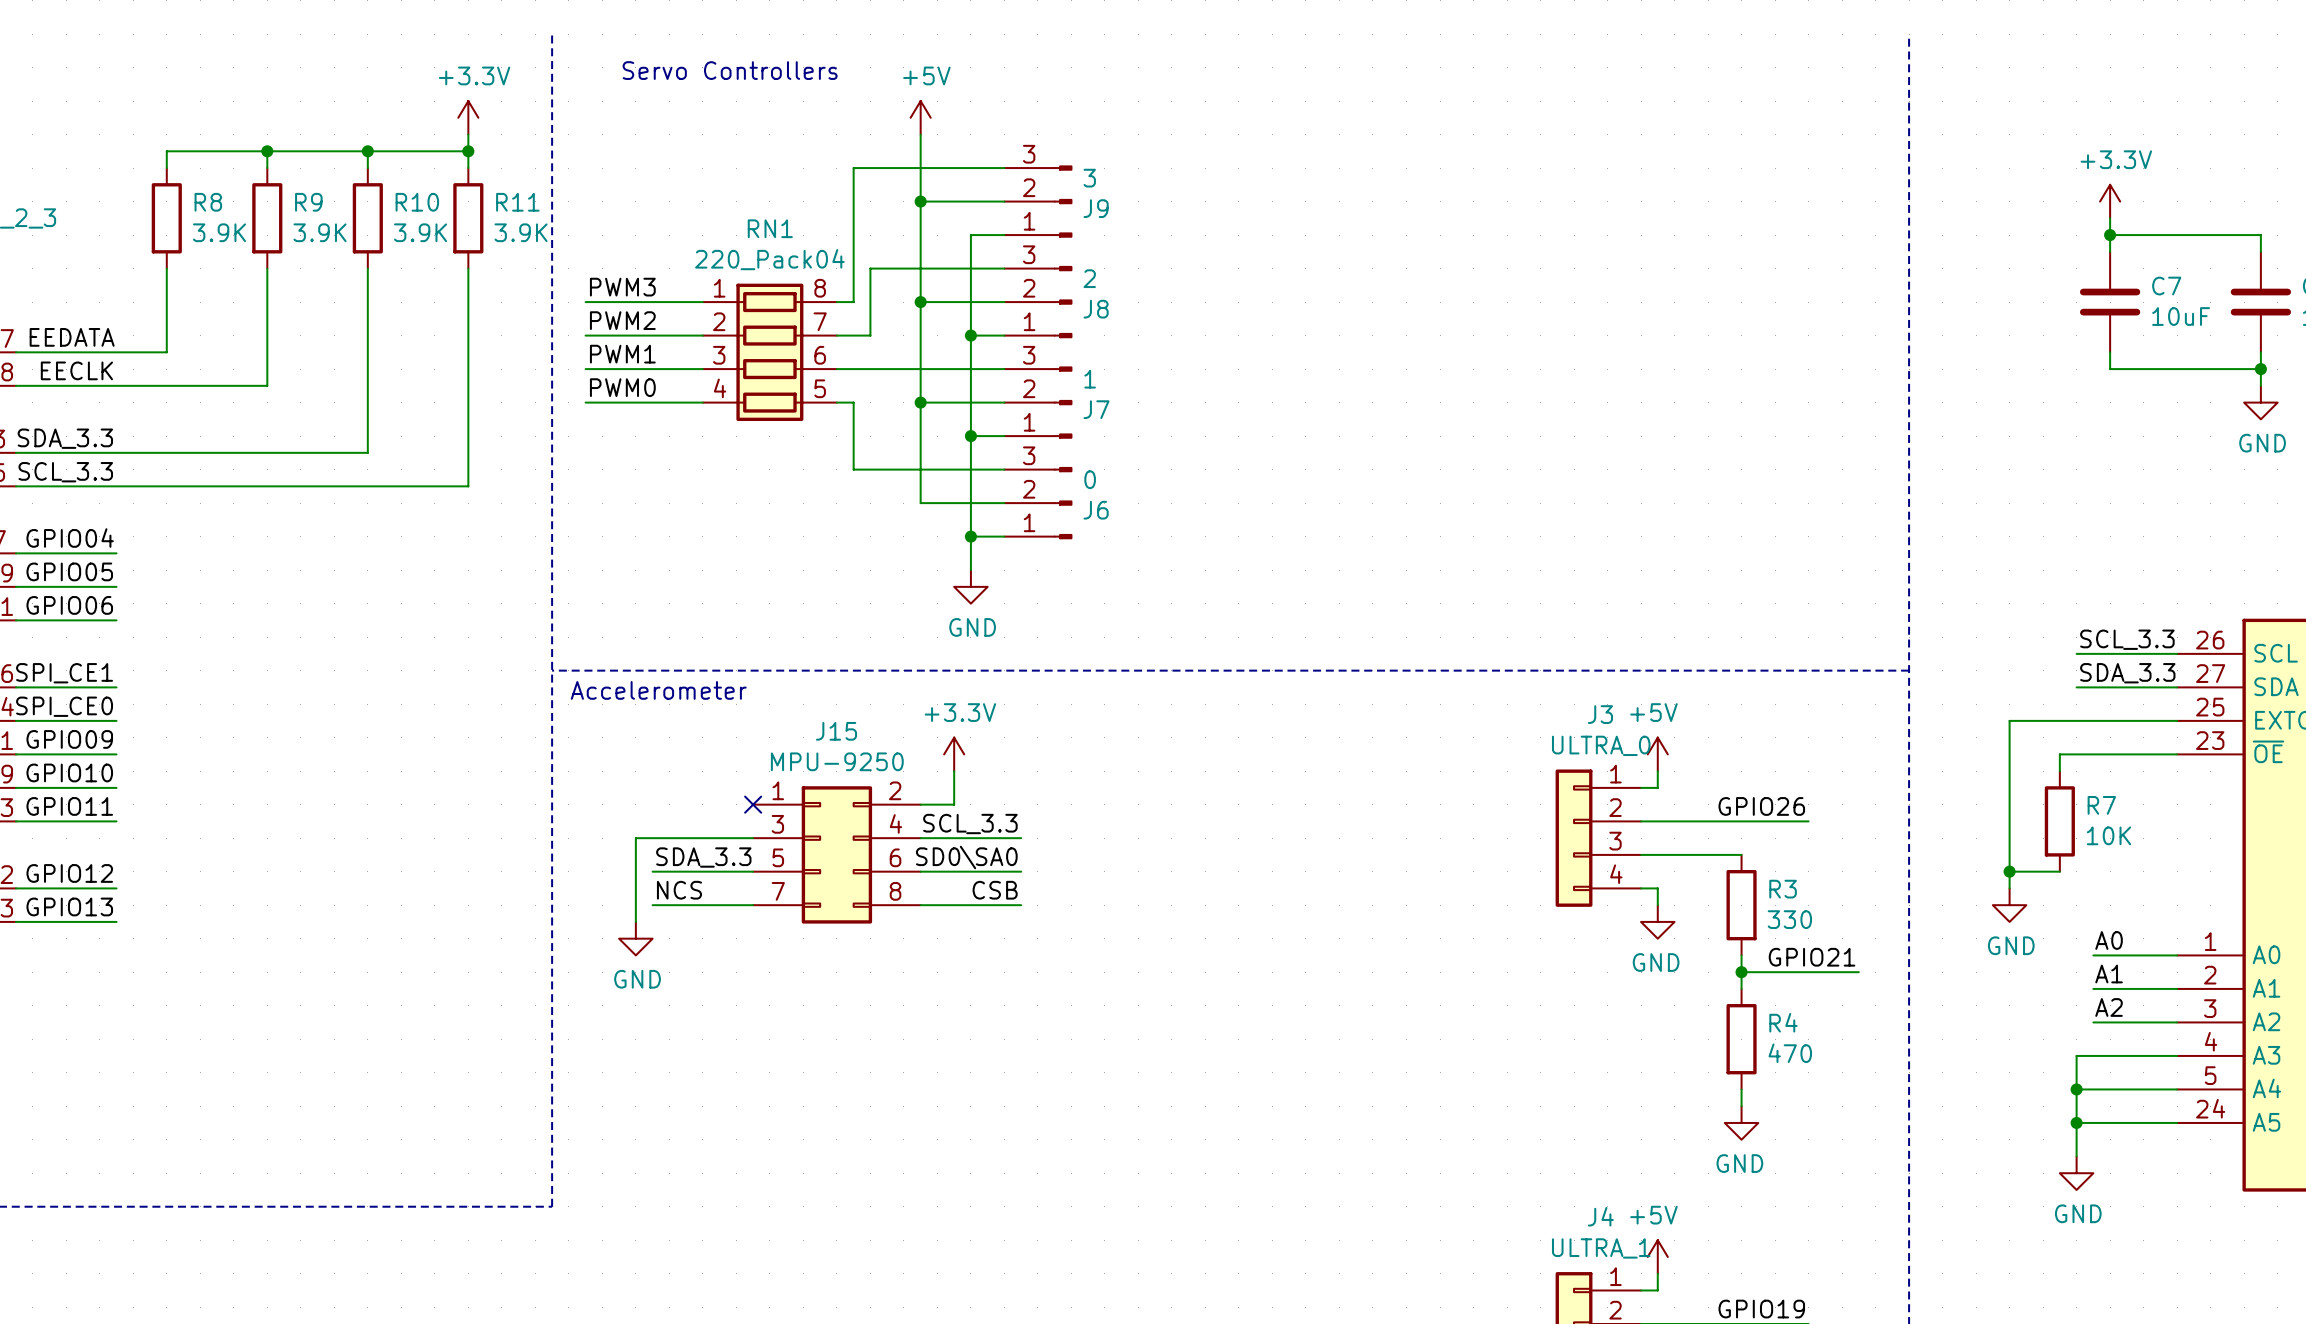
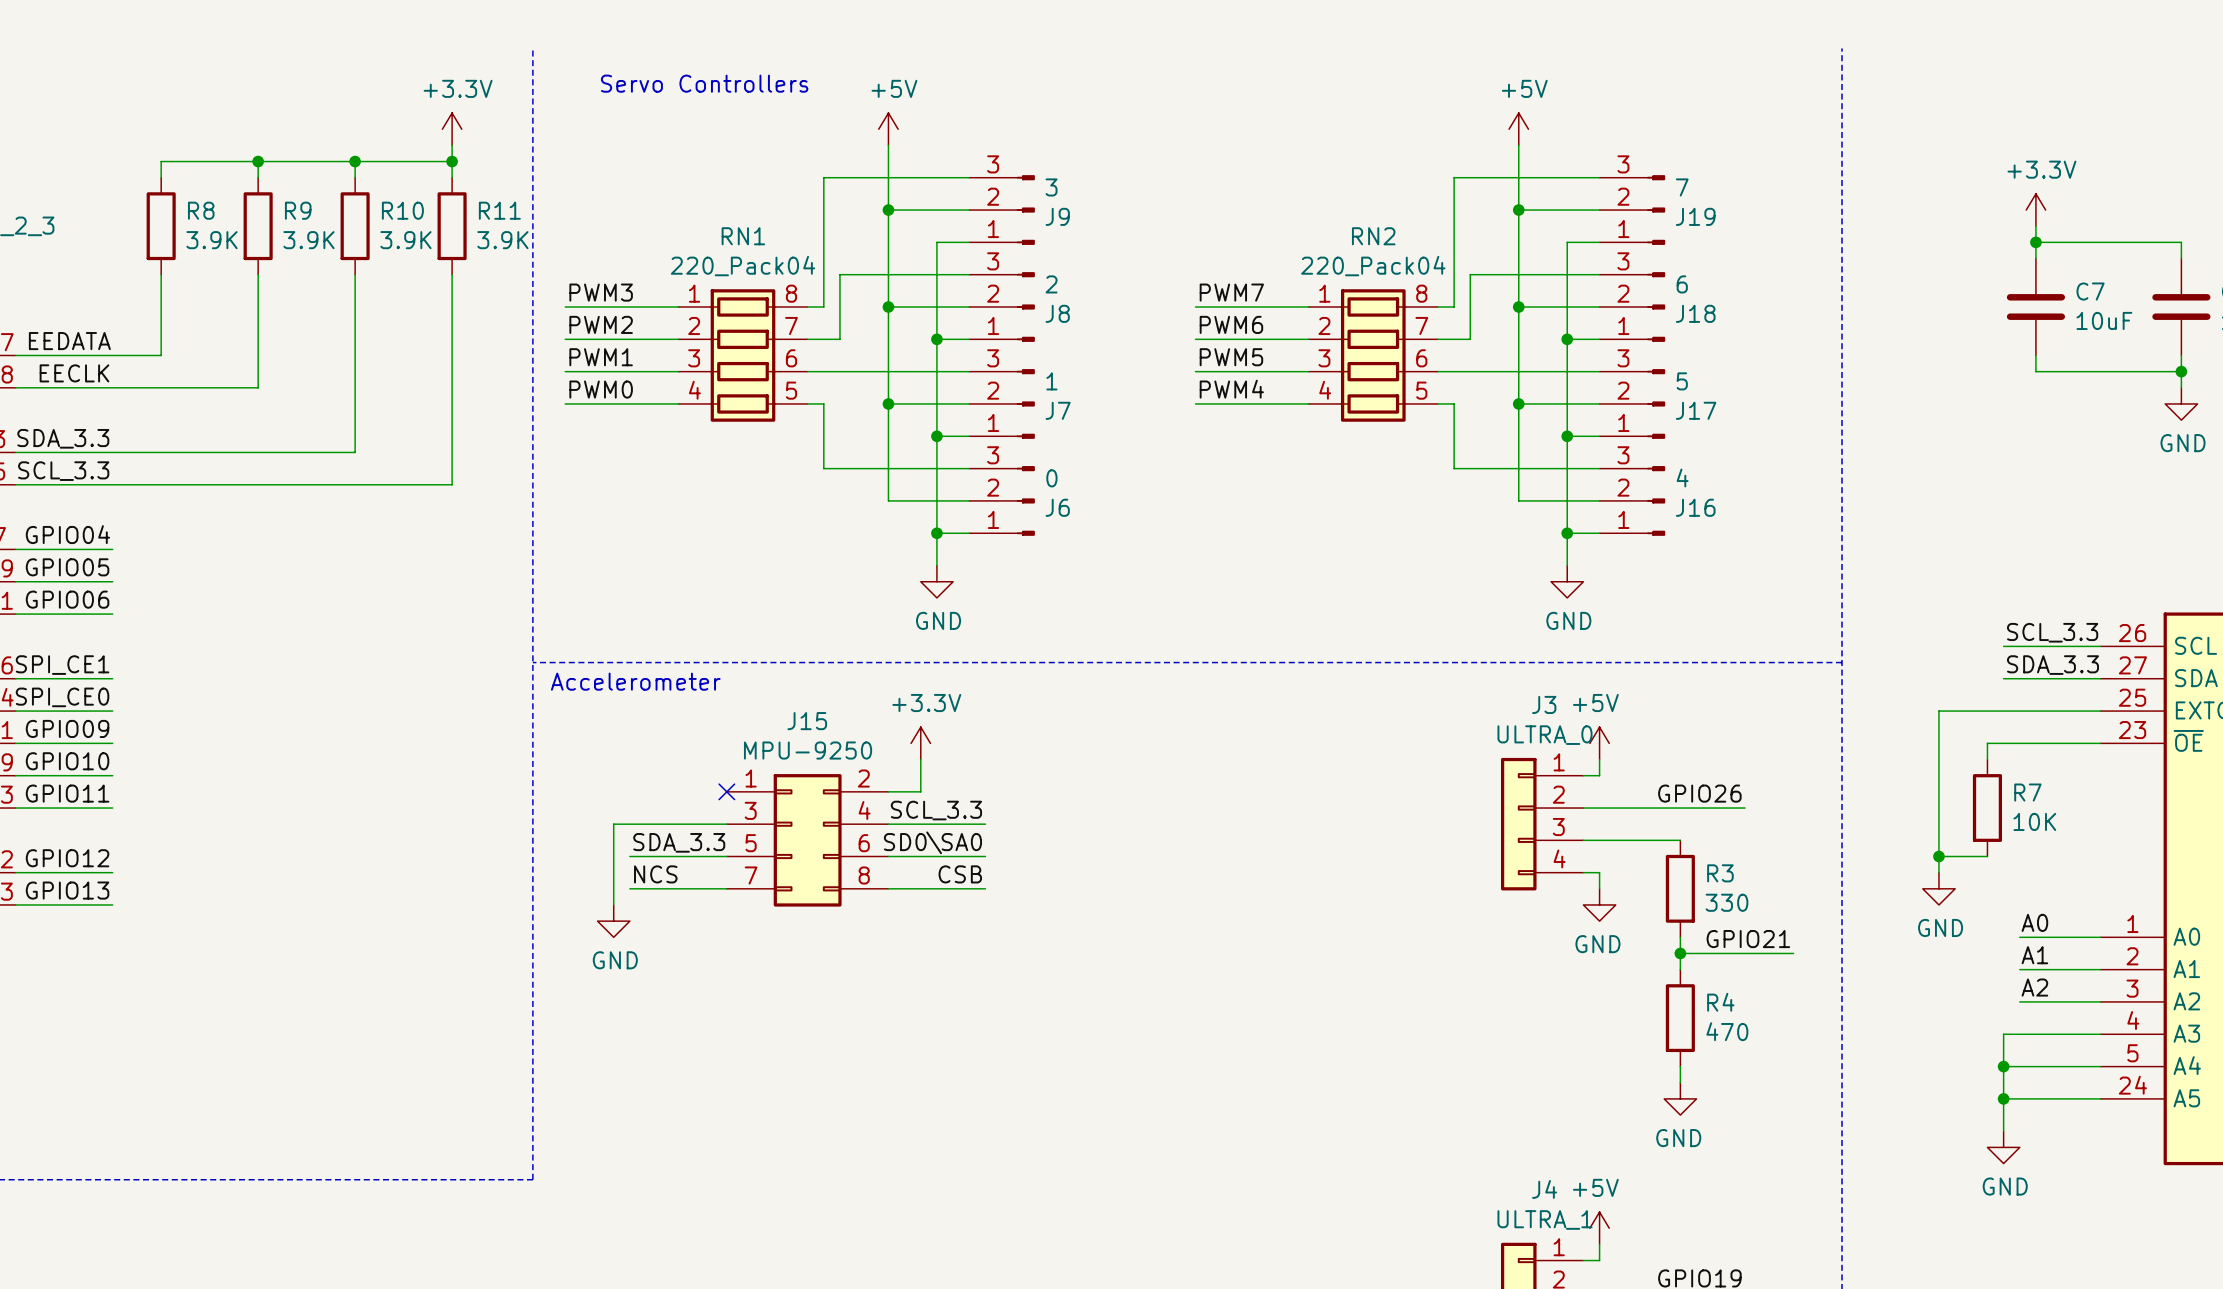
power symbol: none -> +5V (1518, 129)
wire: none -> (1518, 145) (1518, 500) (1599, 500)
wire: none -> (1599, 177) (1454, 177) (1454, 307) (1437, 307)
wire: none -> (1518, 210) (1599, 210)
junction: none -> (1518, 210)
J19: none -> 7 (1632, 210)
wire: none -> (1599, 242) (1567, 242) (1567, 565)
wire: none -> (1599, 274) (1470, 274) (1470, 339) (1437, 339)
label: none -> PWM7 (1231, 292)
wire: none -> (1195, 307) (1308, 307)
wire: none -> (1518, 307) (1599, 307)
junction: none -> (1518, 307)
J18: none -> 6 (1632, 307)
label: none -> PWM6 (1231, 324)
wire: none -> (1195, 339) (1308, 339)
wire: none -> (1567, 339) (1599, 339)
junction: none -> (1567, 339)
RN2: none -> 220_Pack04 (1373, 355)
label: none -> PWM5 (1231, 357)
wire: none -> (1195, 371) (1308, 371)
wire: none -> (1437, 371) (1599, 371)
label: none -> PWM4 (1231, 389)
wire: none -> (1195, 403) (1308, 403)
wire: none -> (1437, 403) (1454, 403) (1454, 468) (1599, 468)
wire: none -> (1518, 403) (1599, 403)
junction: none -> (1518, 403)
J17: none -> 5 (1632, 403)
wire: none -> (1567, 436) (1599, 436)
junction: none -> (1567, 436)
J16: none -> 4 (1632, 500)
wire: none -> (1567, 533) (1599, 533)
junction: none -> (1567, 533)
power symbol: none -> GND (1567, 581)

